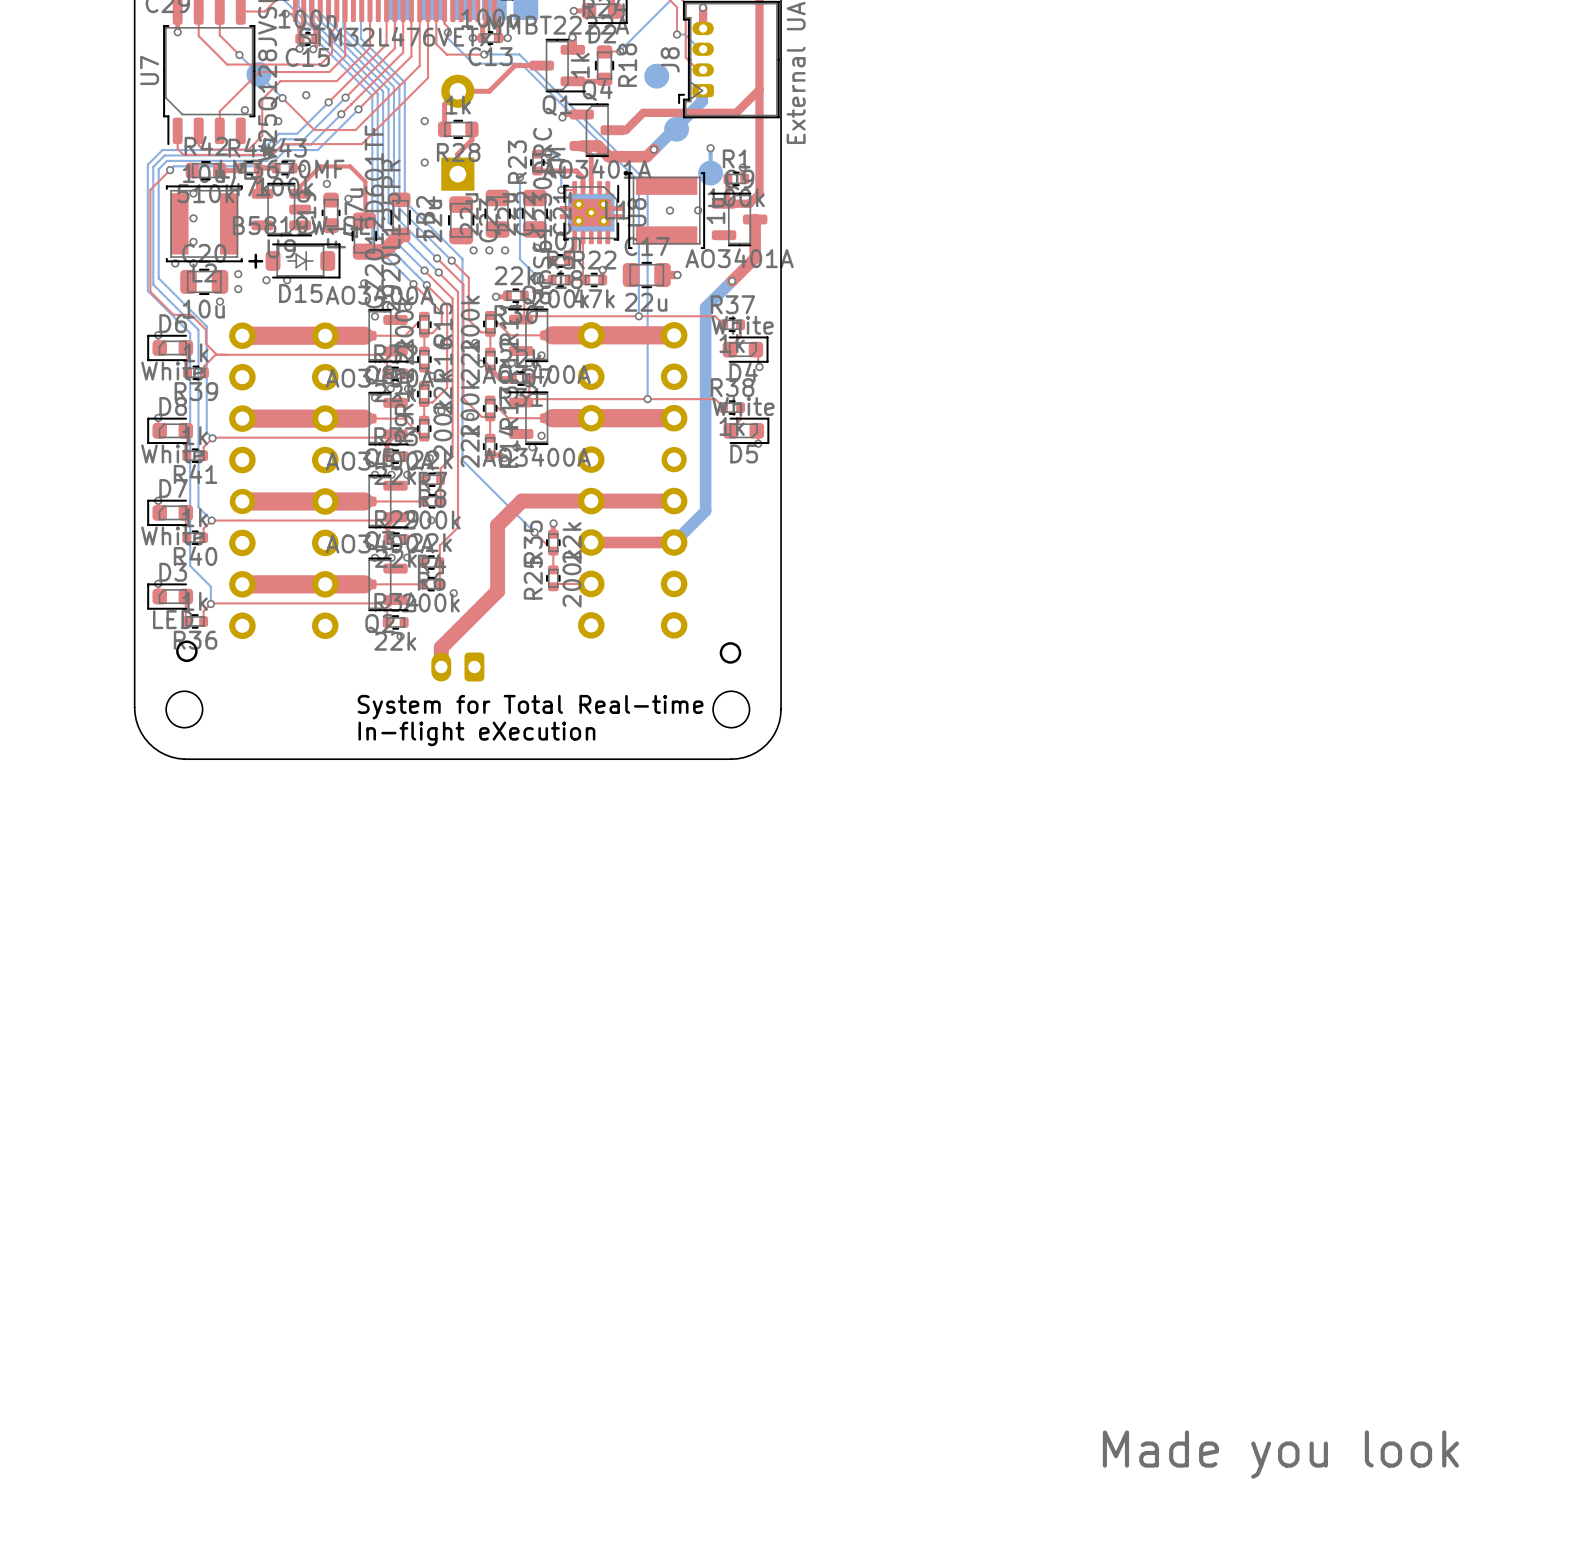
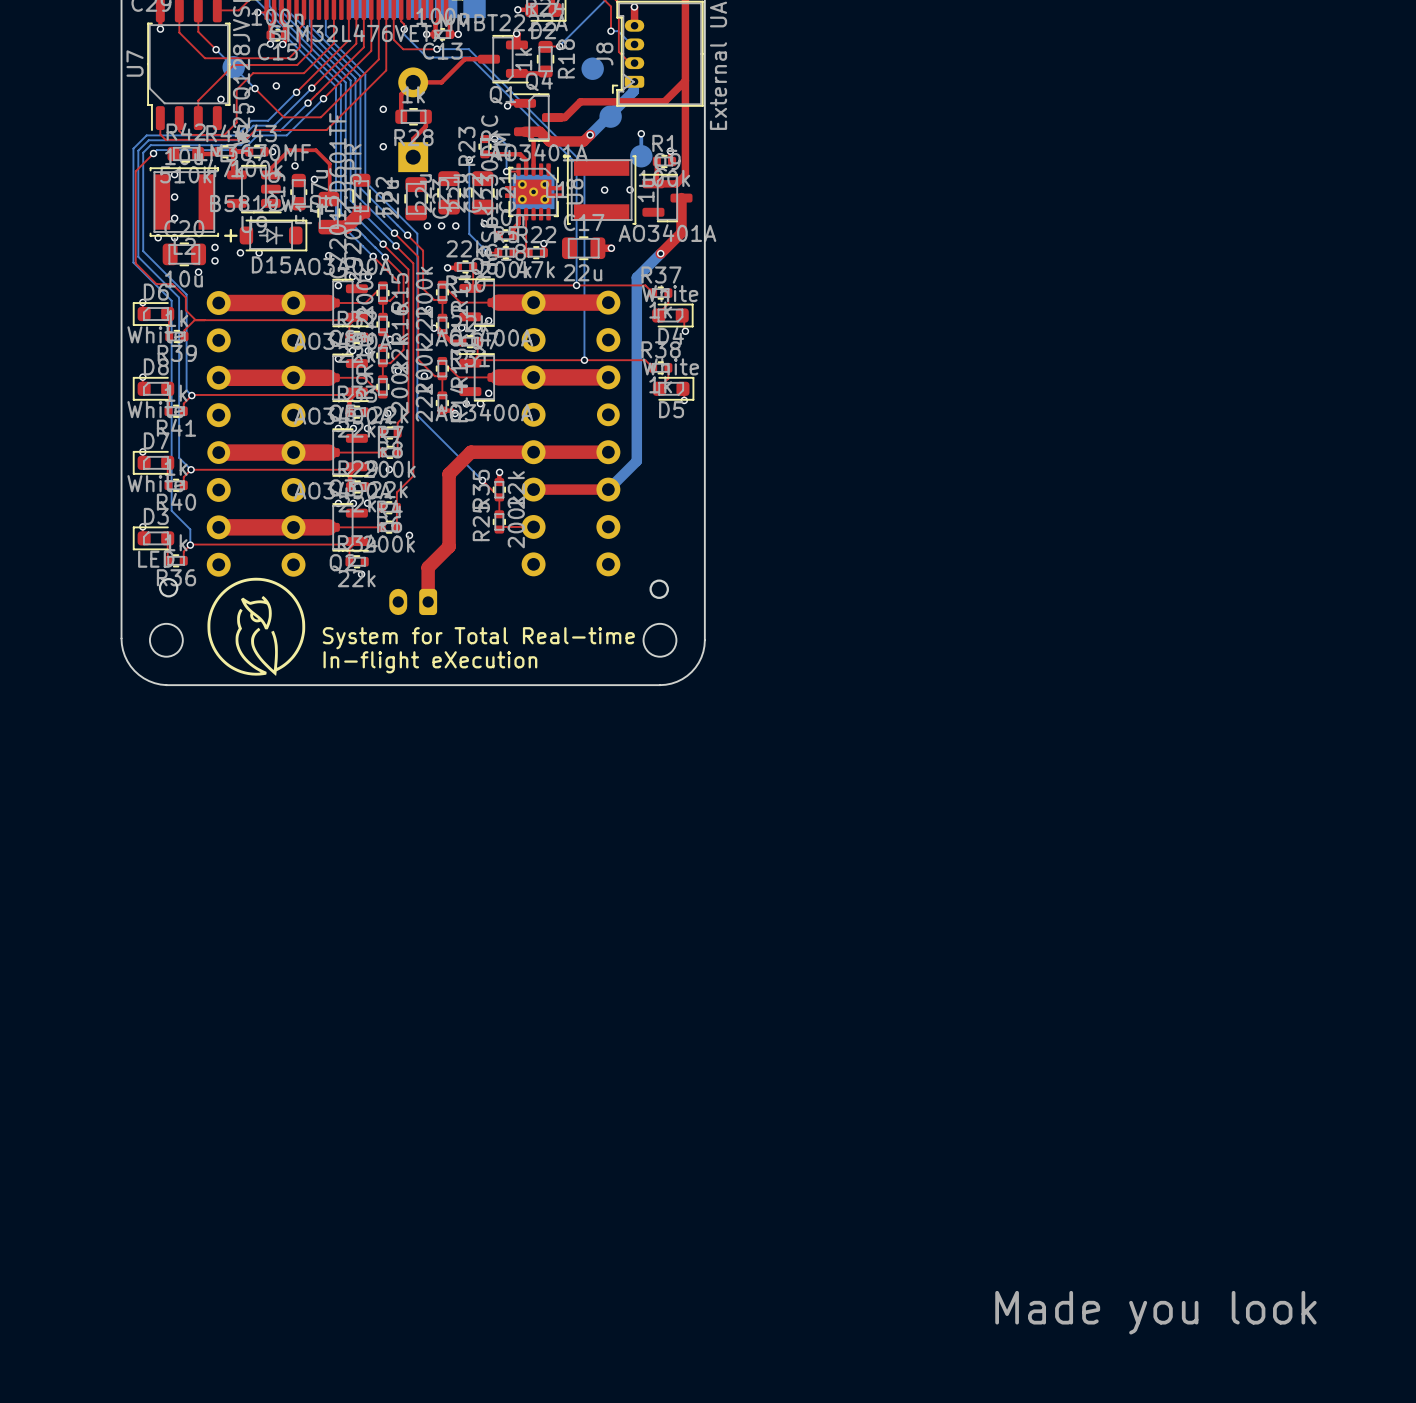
top track: (497, 591) (441, 647) (441, 667) -> (449, 533) (449, 546) (428, 567) (428, 602)
drawing: none -> [207, 577, 306, 676]

